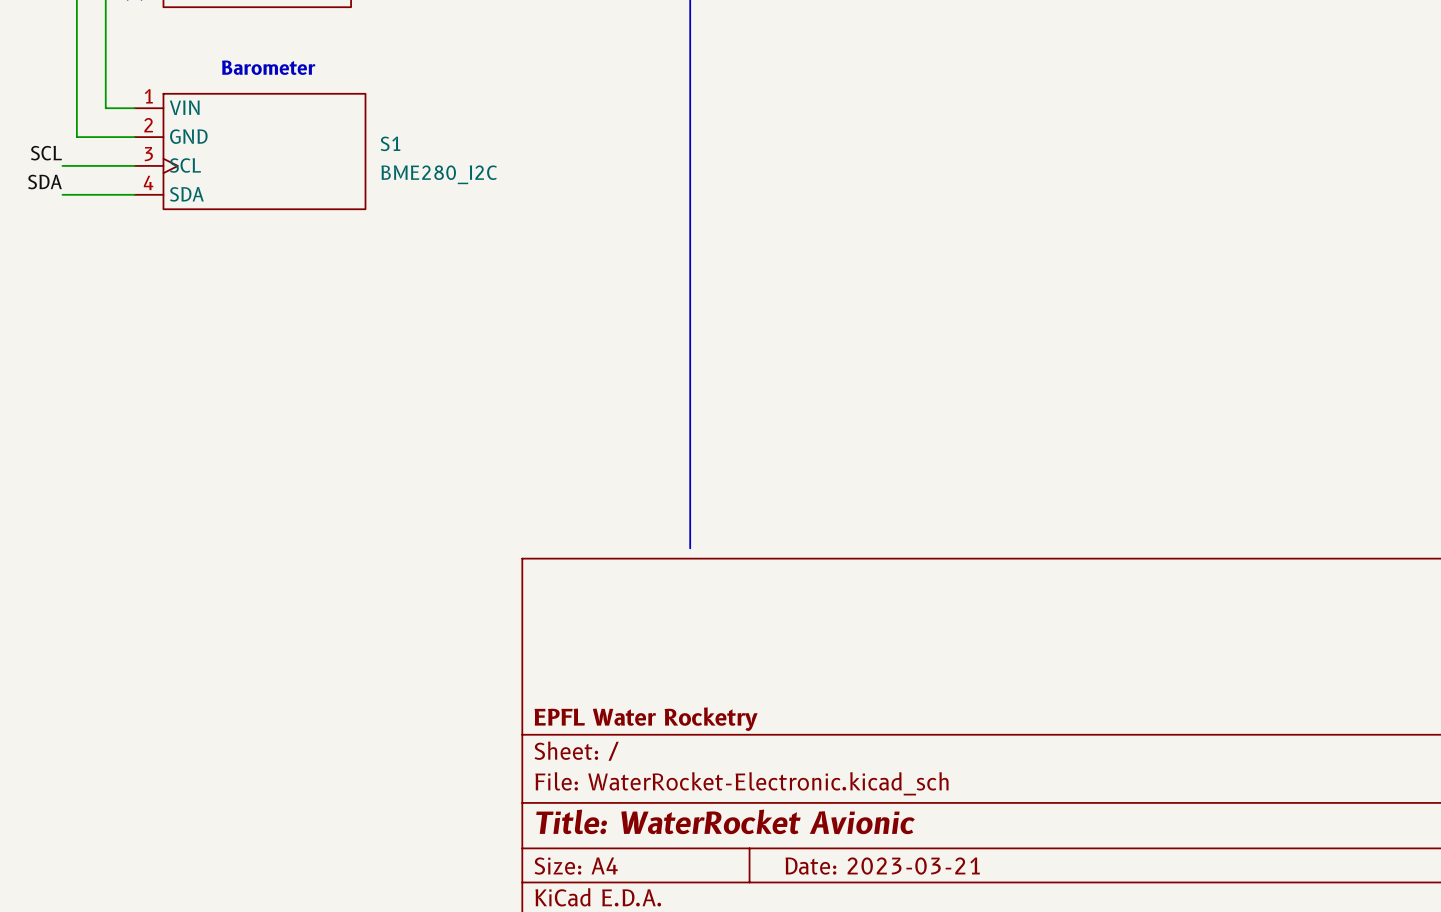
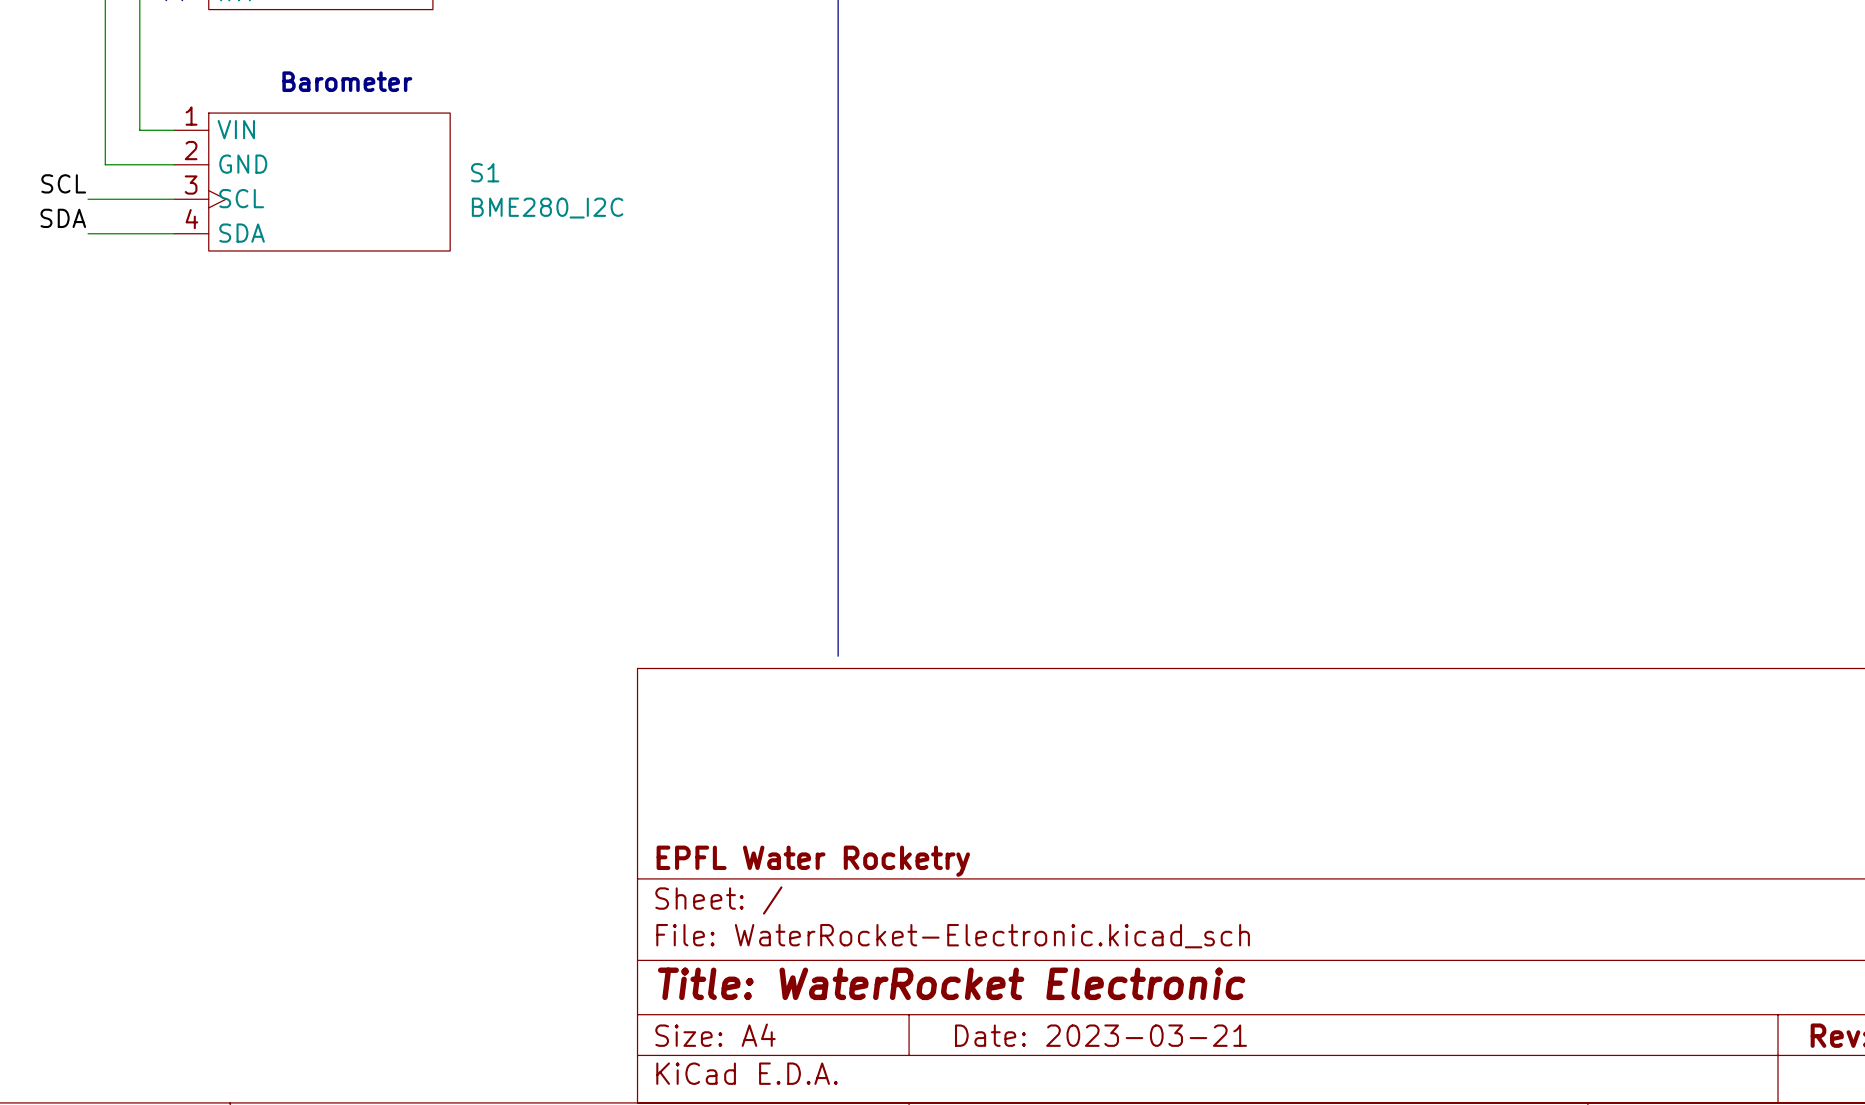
title block: Title: WaterRocket Avionic (725, 821) -> Title: WaterRocket Electronic (951, 983)

